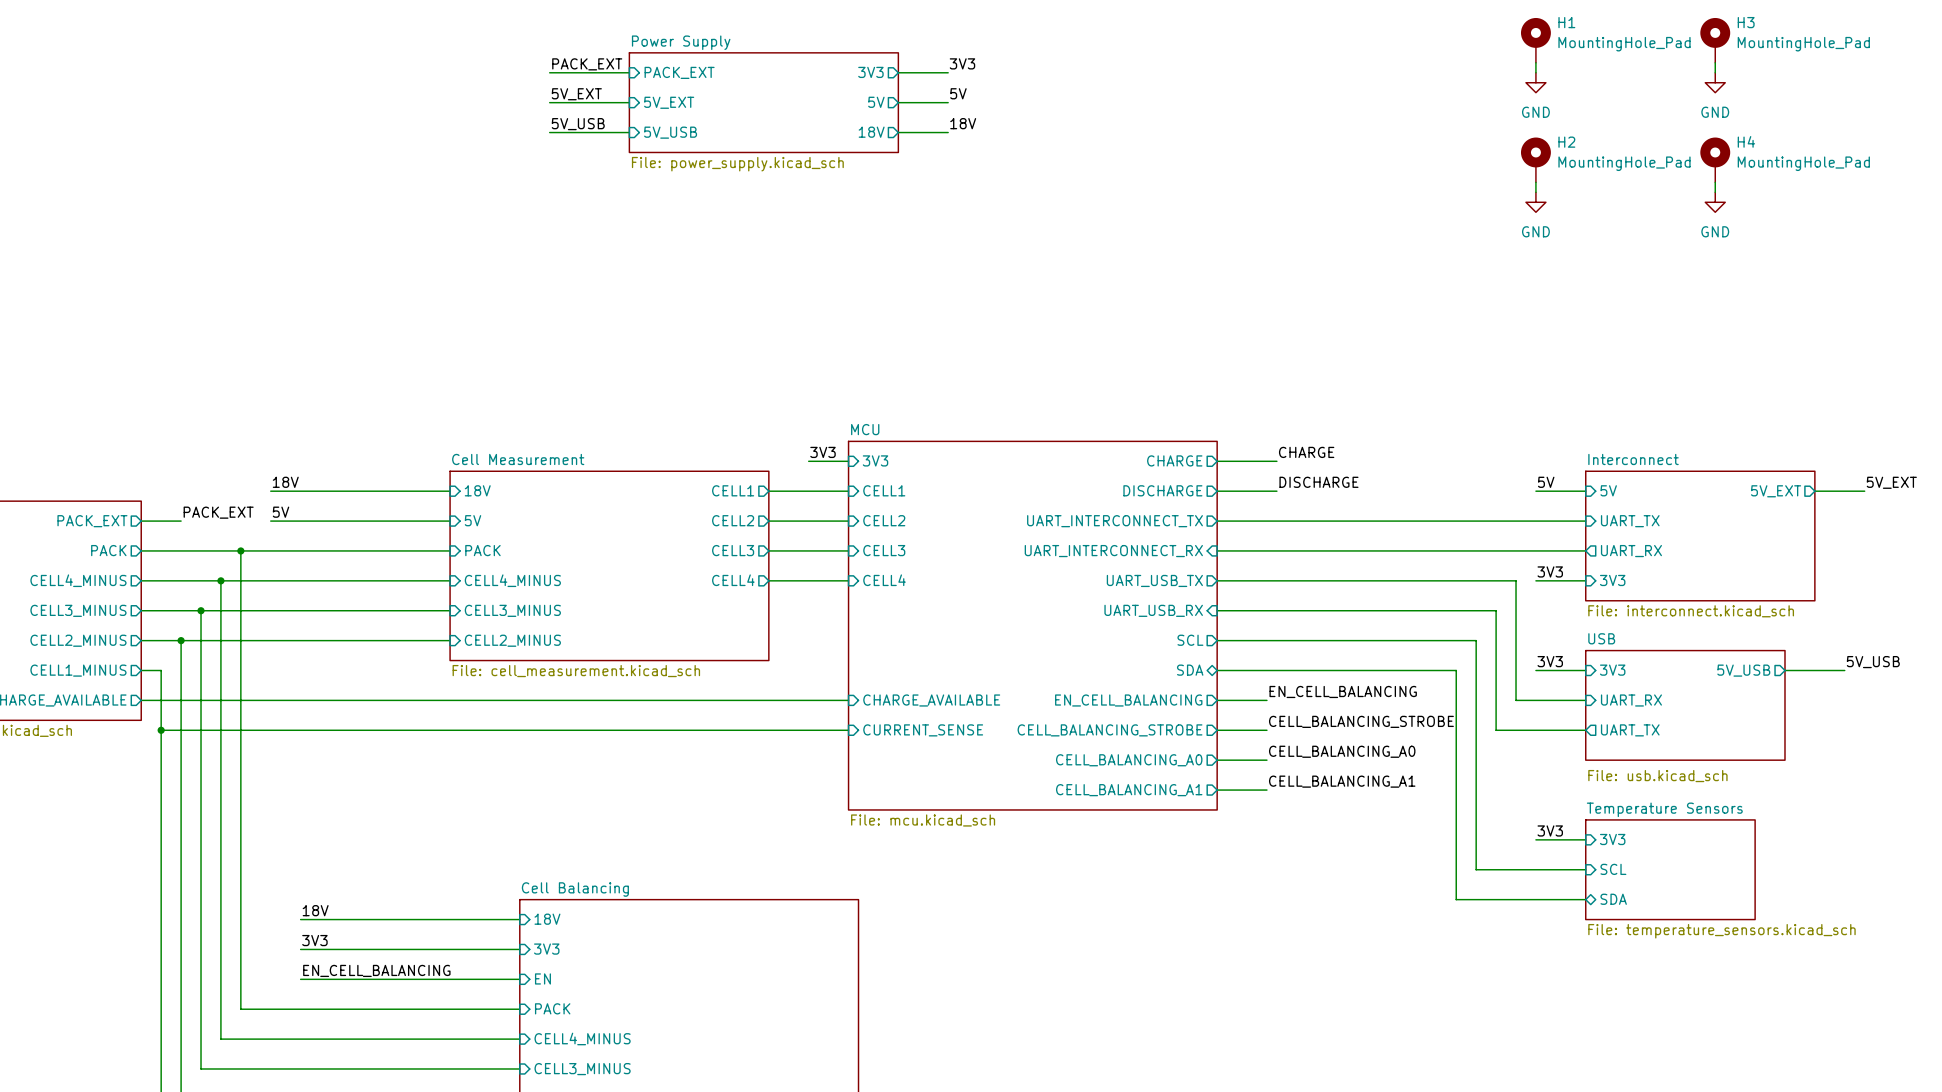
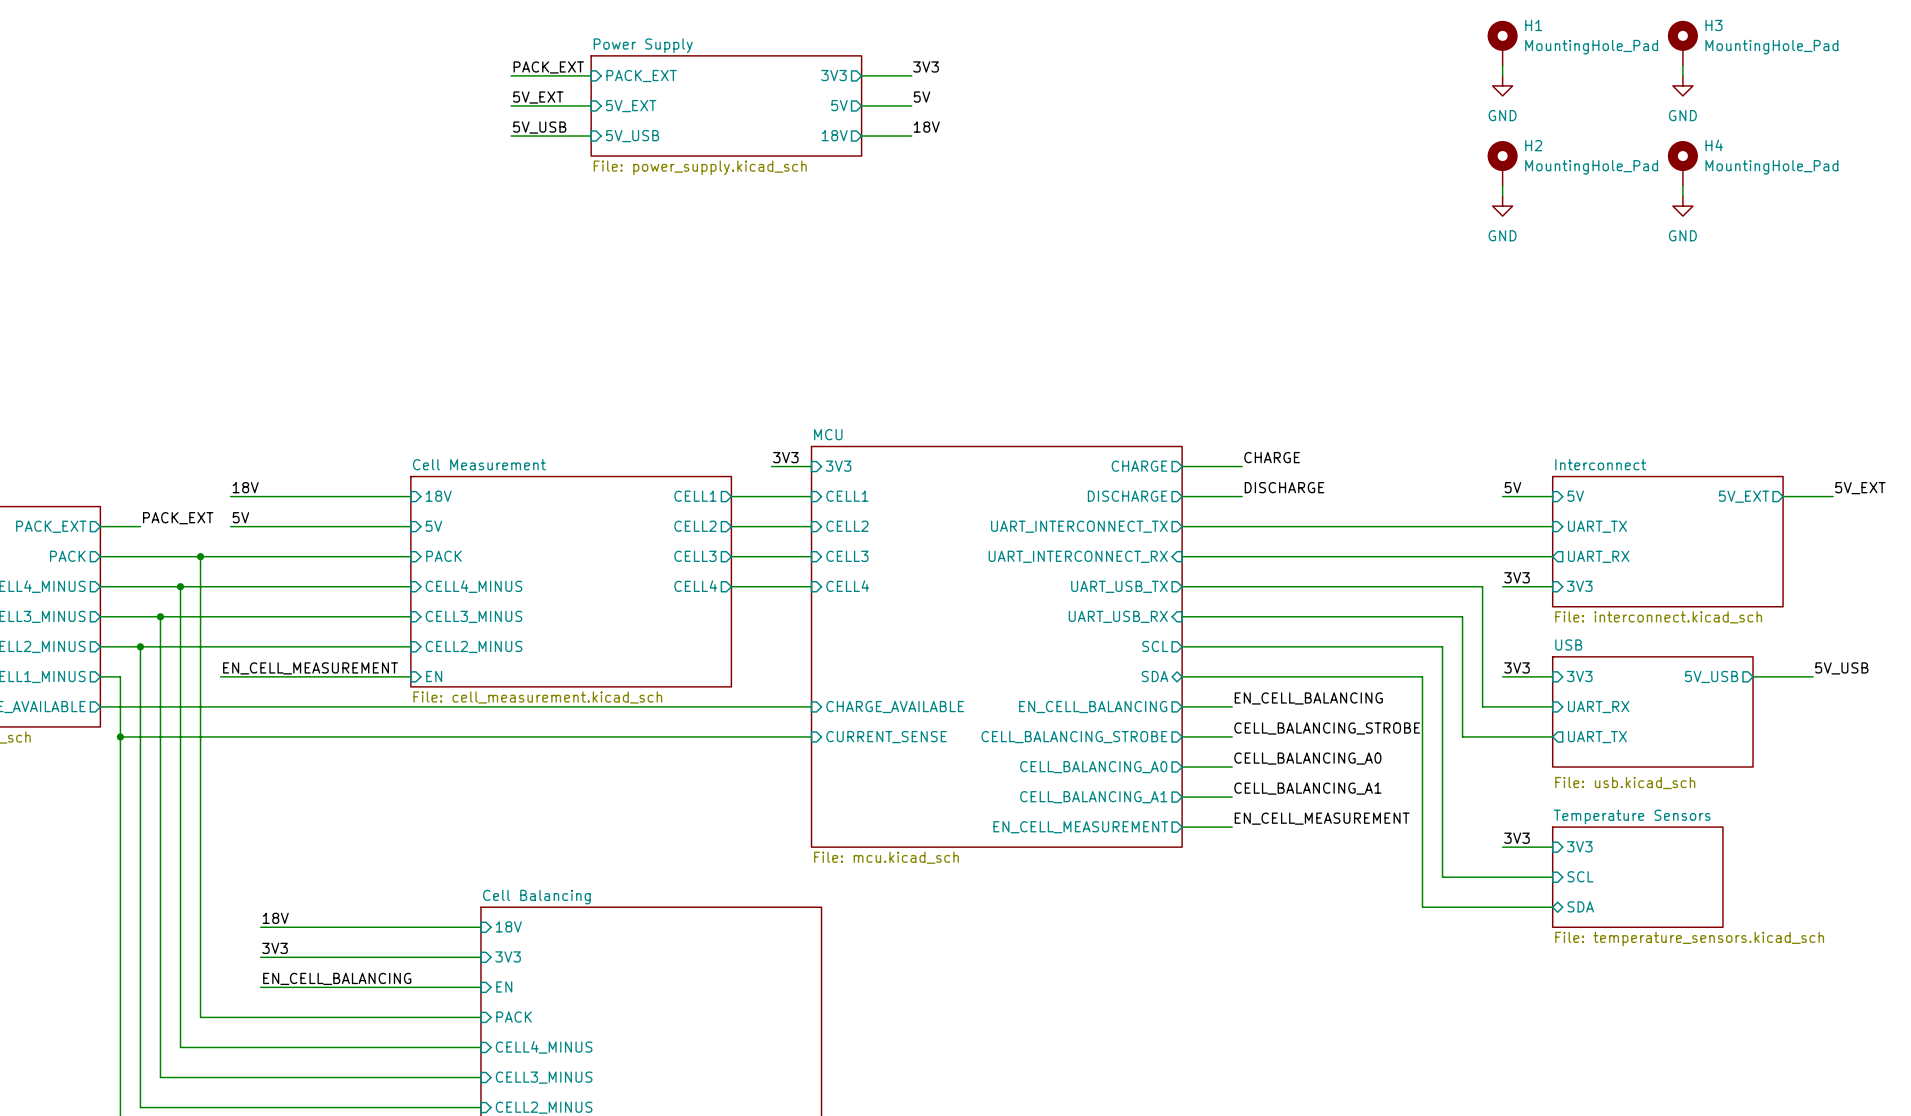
sheet Cell Measurement: File: cell_measurement.kicad_sch (609, 565) -> none
sheet Cell Measurement: none -> File: cell_measurement.kicad_sch (571, 581)
sheet MCU: File: mcu.kicad_sch (1032, 625) -> none
sheet MCU: none -> File: mcu.kicad_sch (996, 646)
label: none -> EN_CELL_MEASUREMENT (310, 668)
wire: none -> (220, 676) (410, 676)
sheet pin: none -> EN (434, 676)
label: none -> EN_CELL_MEASUREMENT (1322, 818)
wire: none -> (1182, 827) (1232, 827)
sheet pin: none -> EN_CELL_MEASUREMENT (1080, 827)

